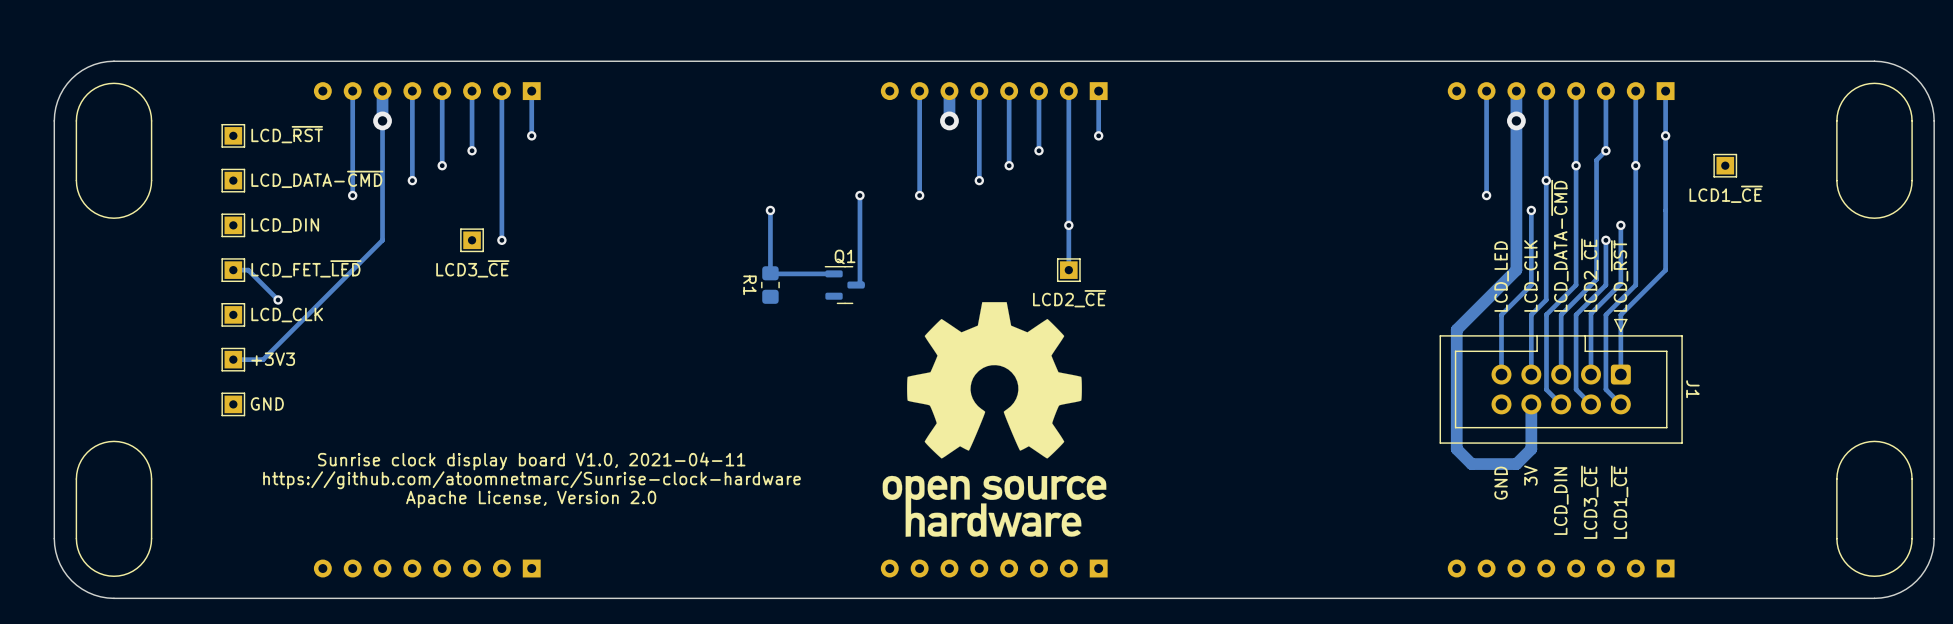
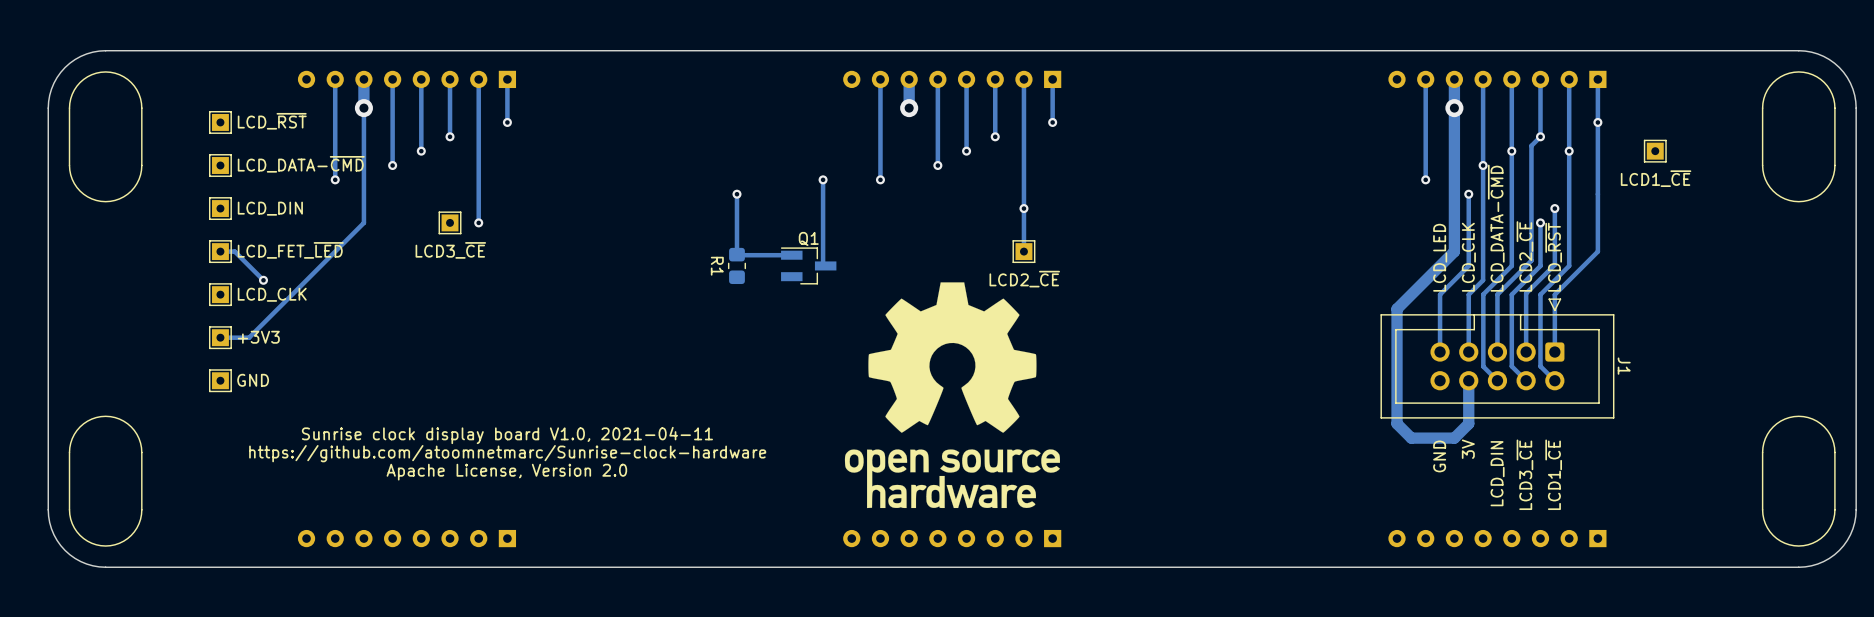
Q1 footprint: [824, 266, 865, 305] -> [780, 247, 837, 285]

